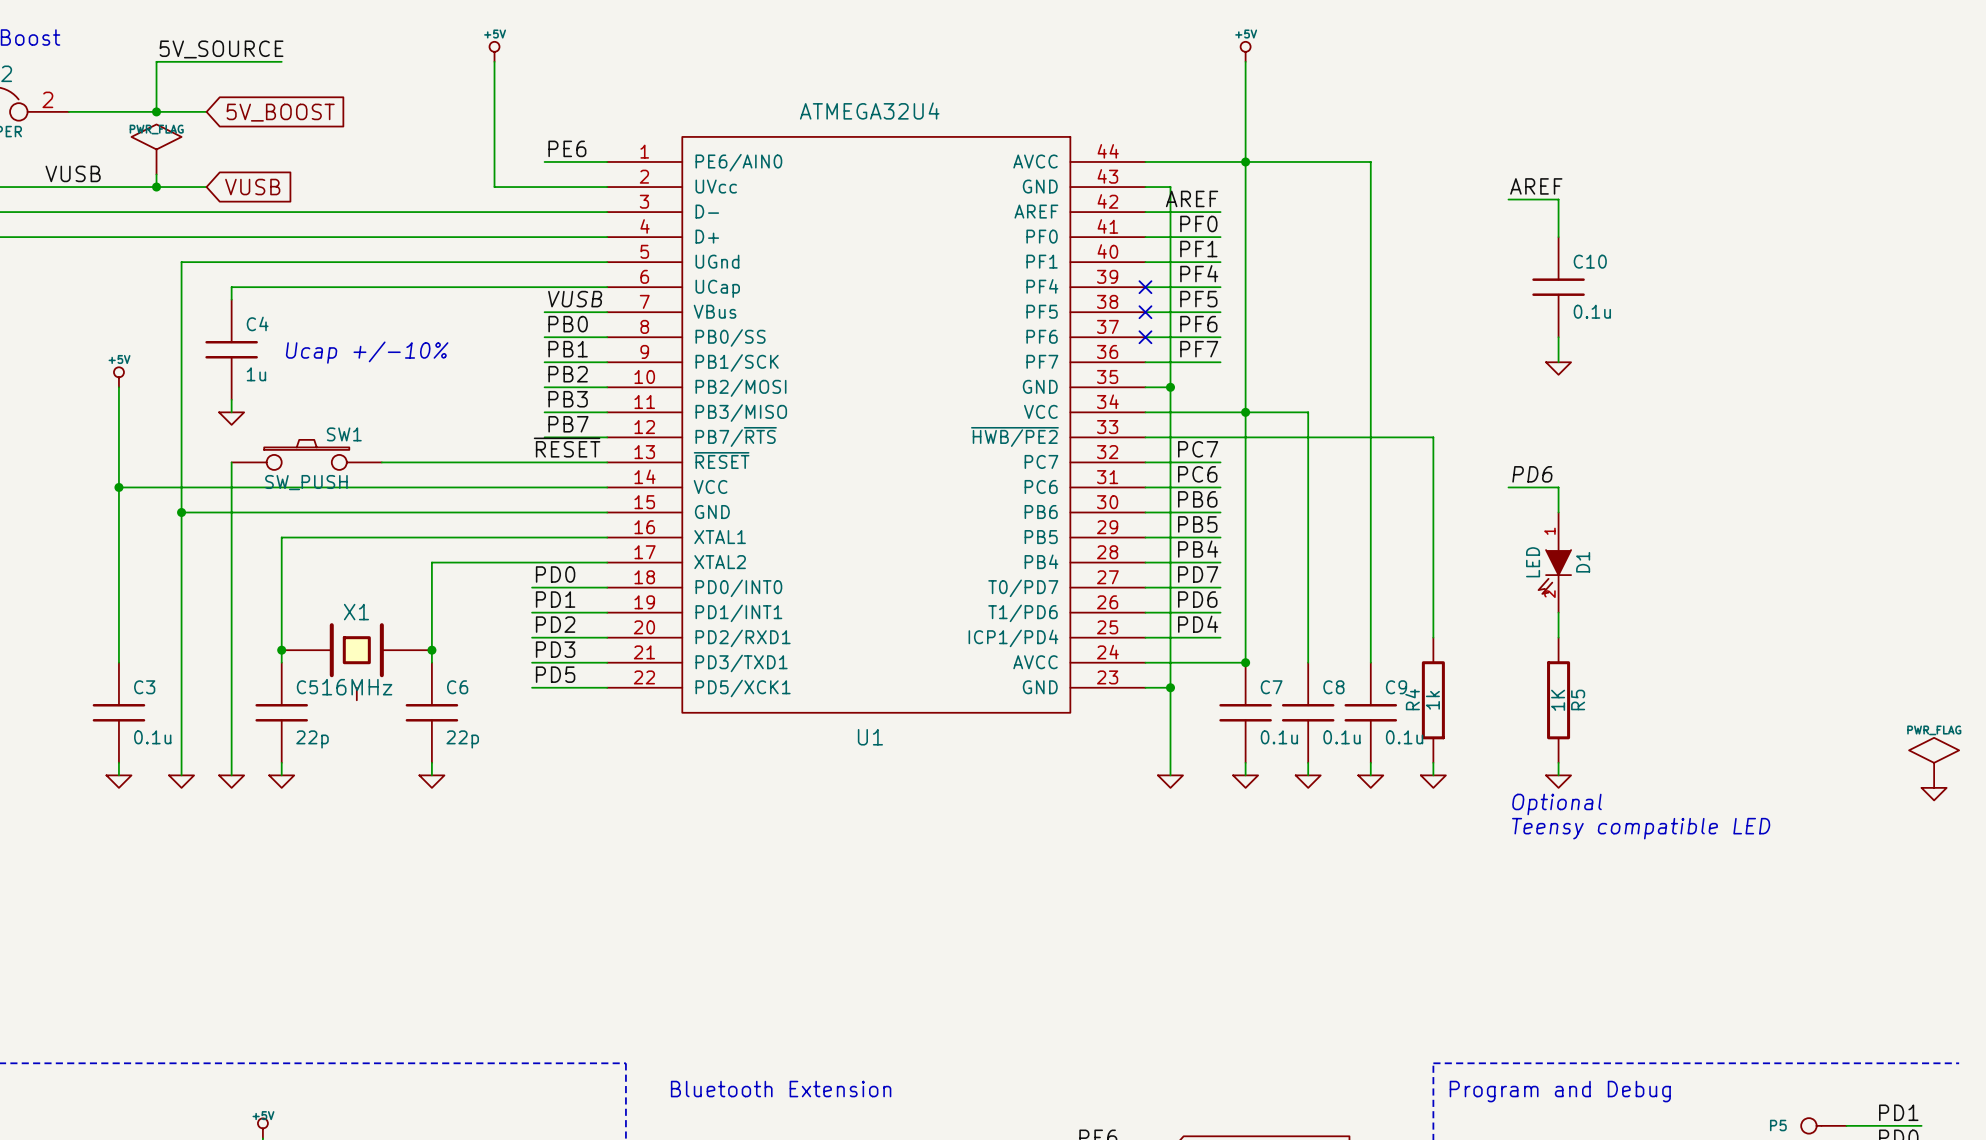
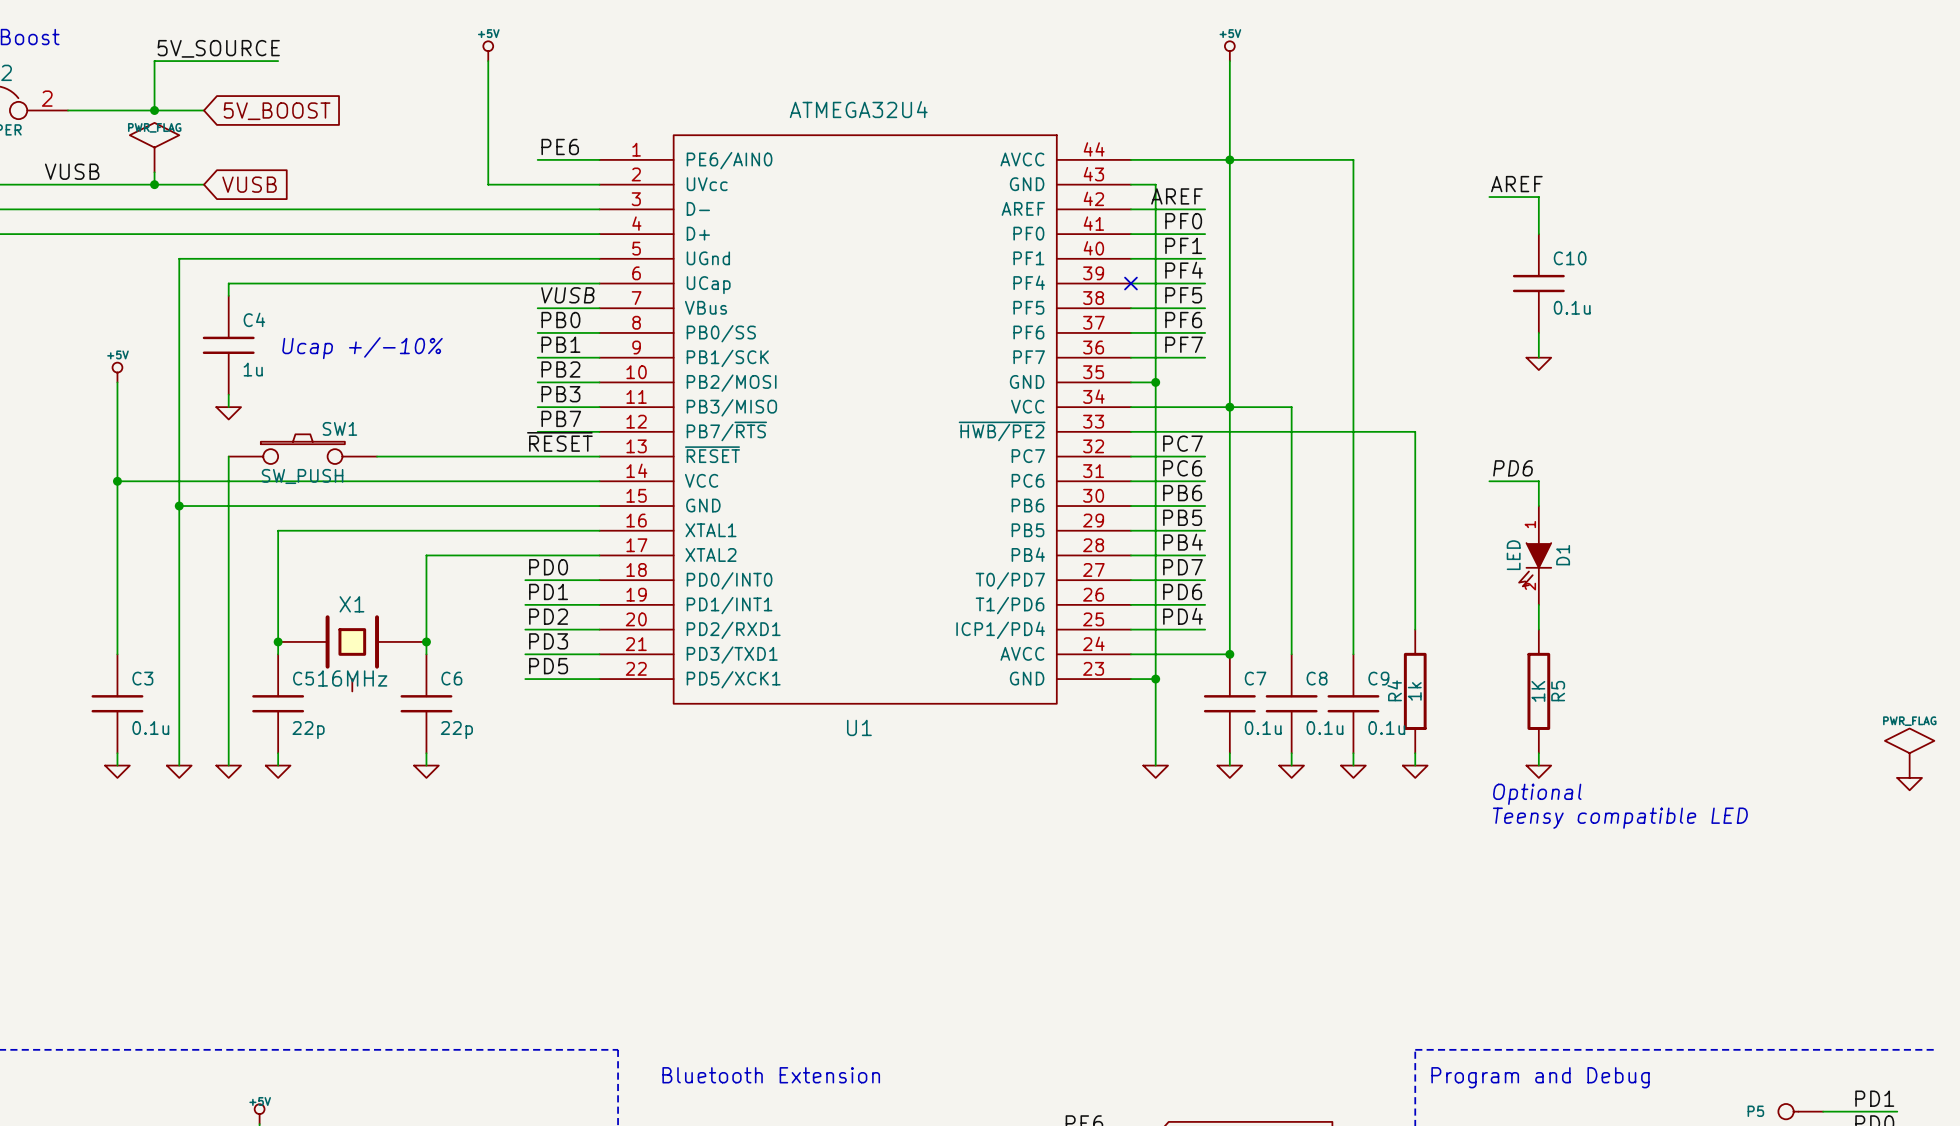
no-connect mark: (1145, 312) -> none
no-connect mark: (1145, 337) -> none

